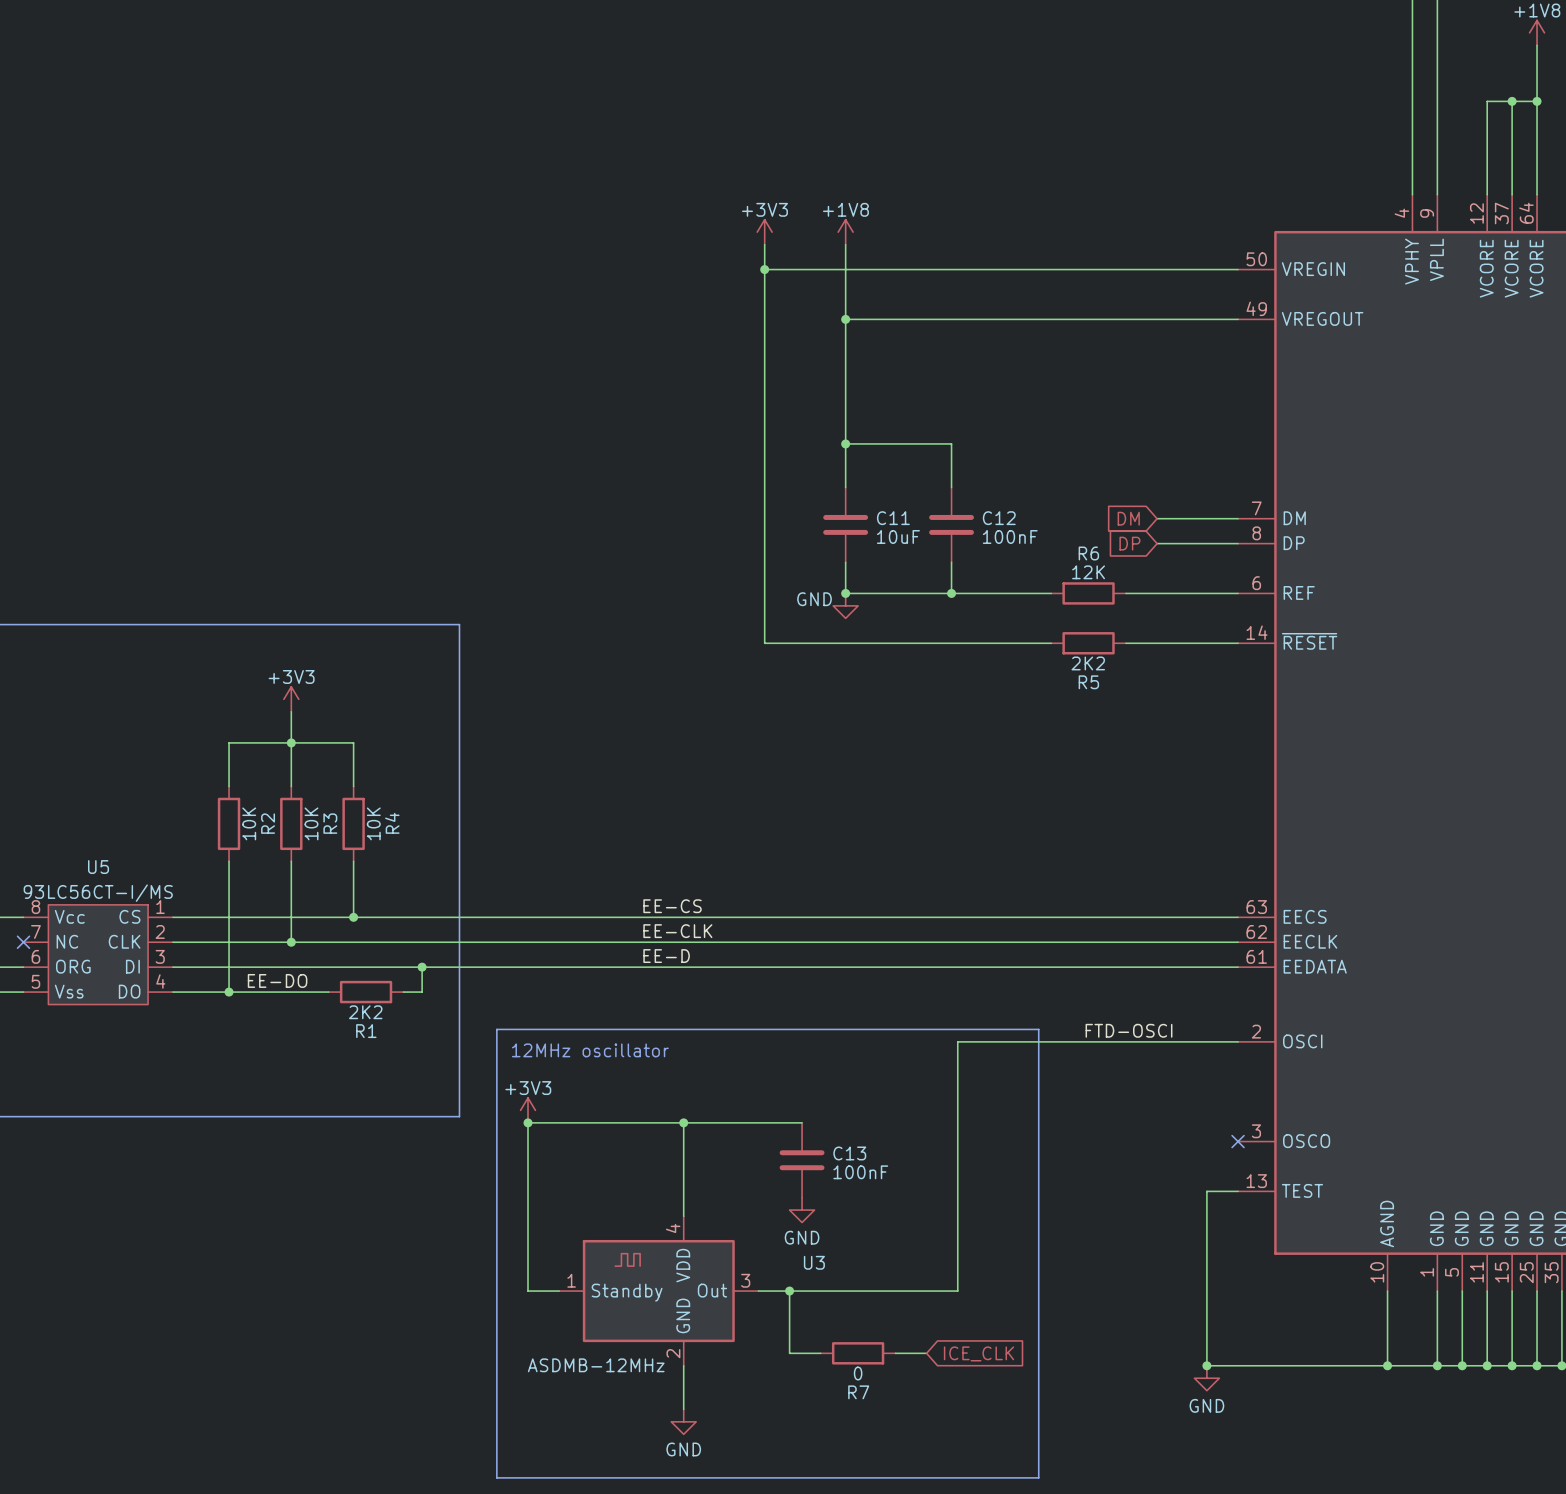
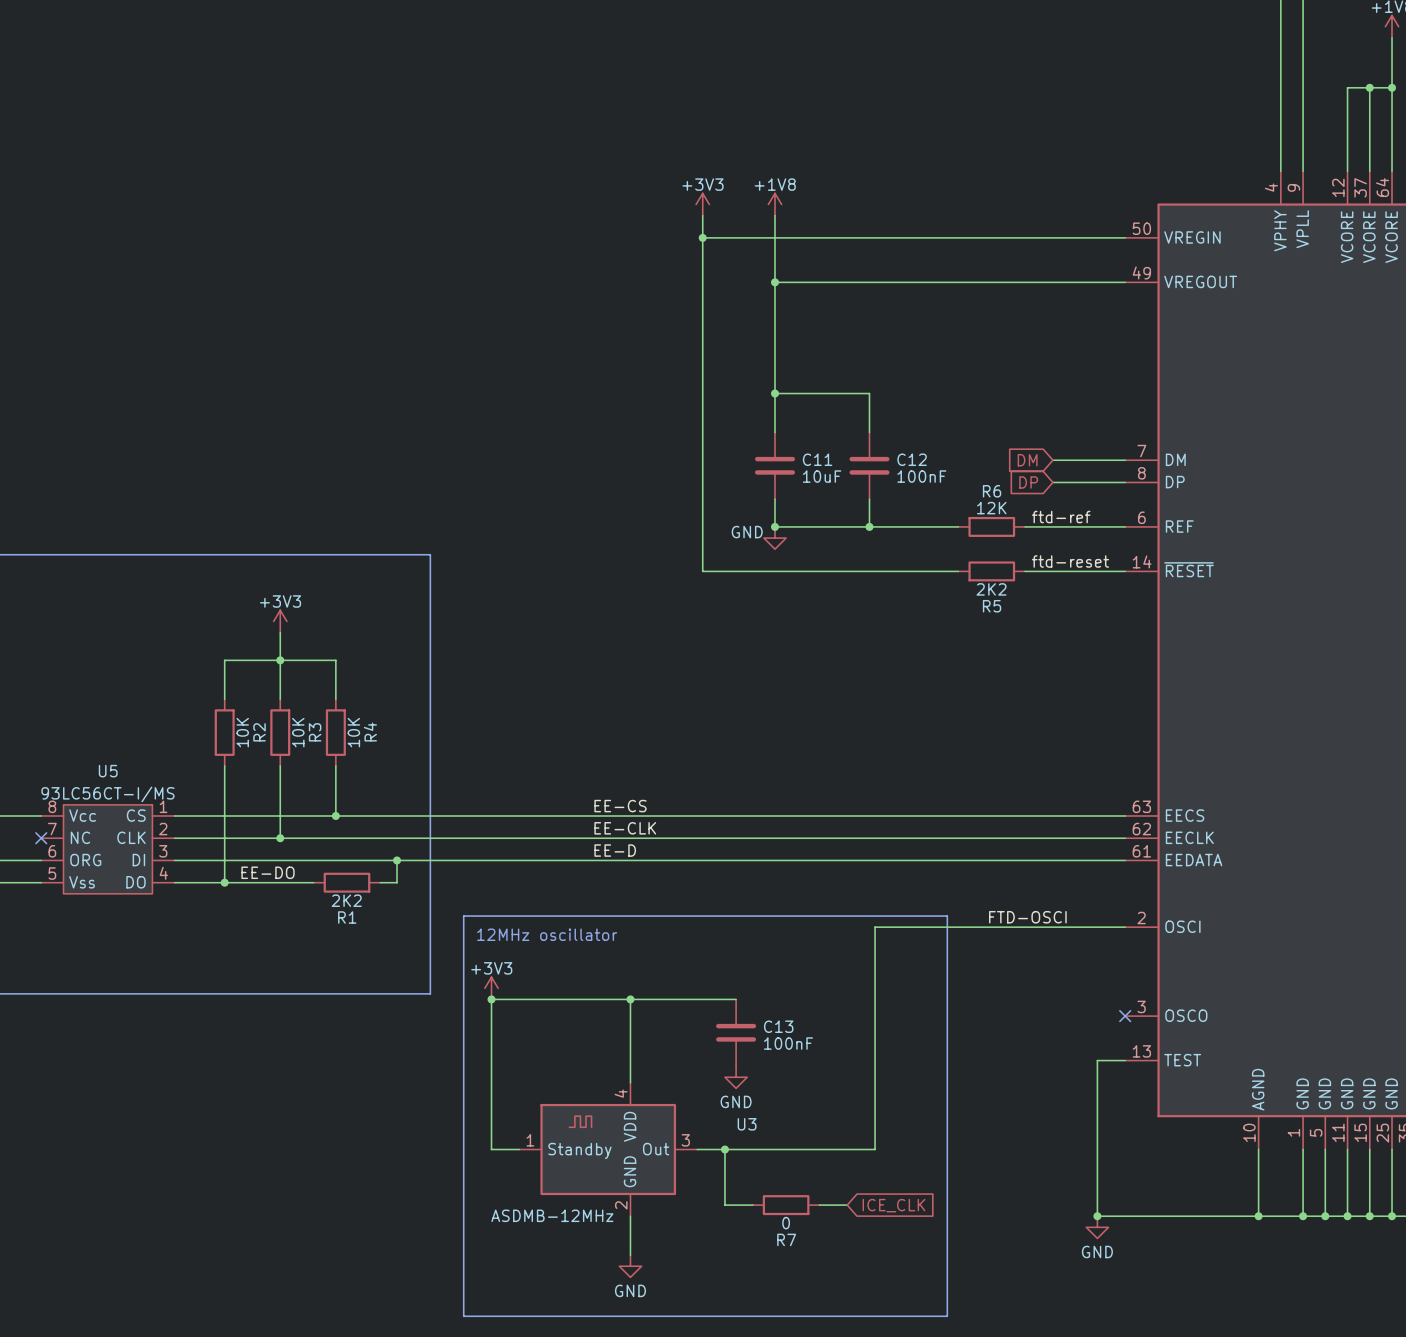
label: none -> ftd-ref (1061, 517)
label: none -> ftd-reset (1070, 561)

